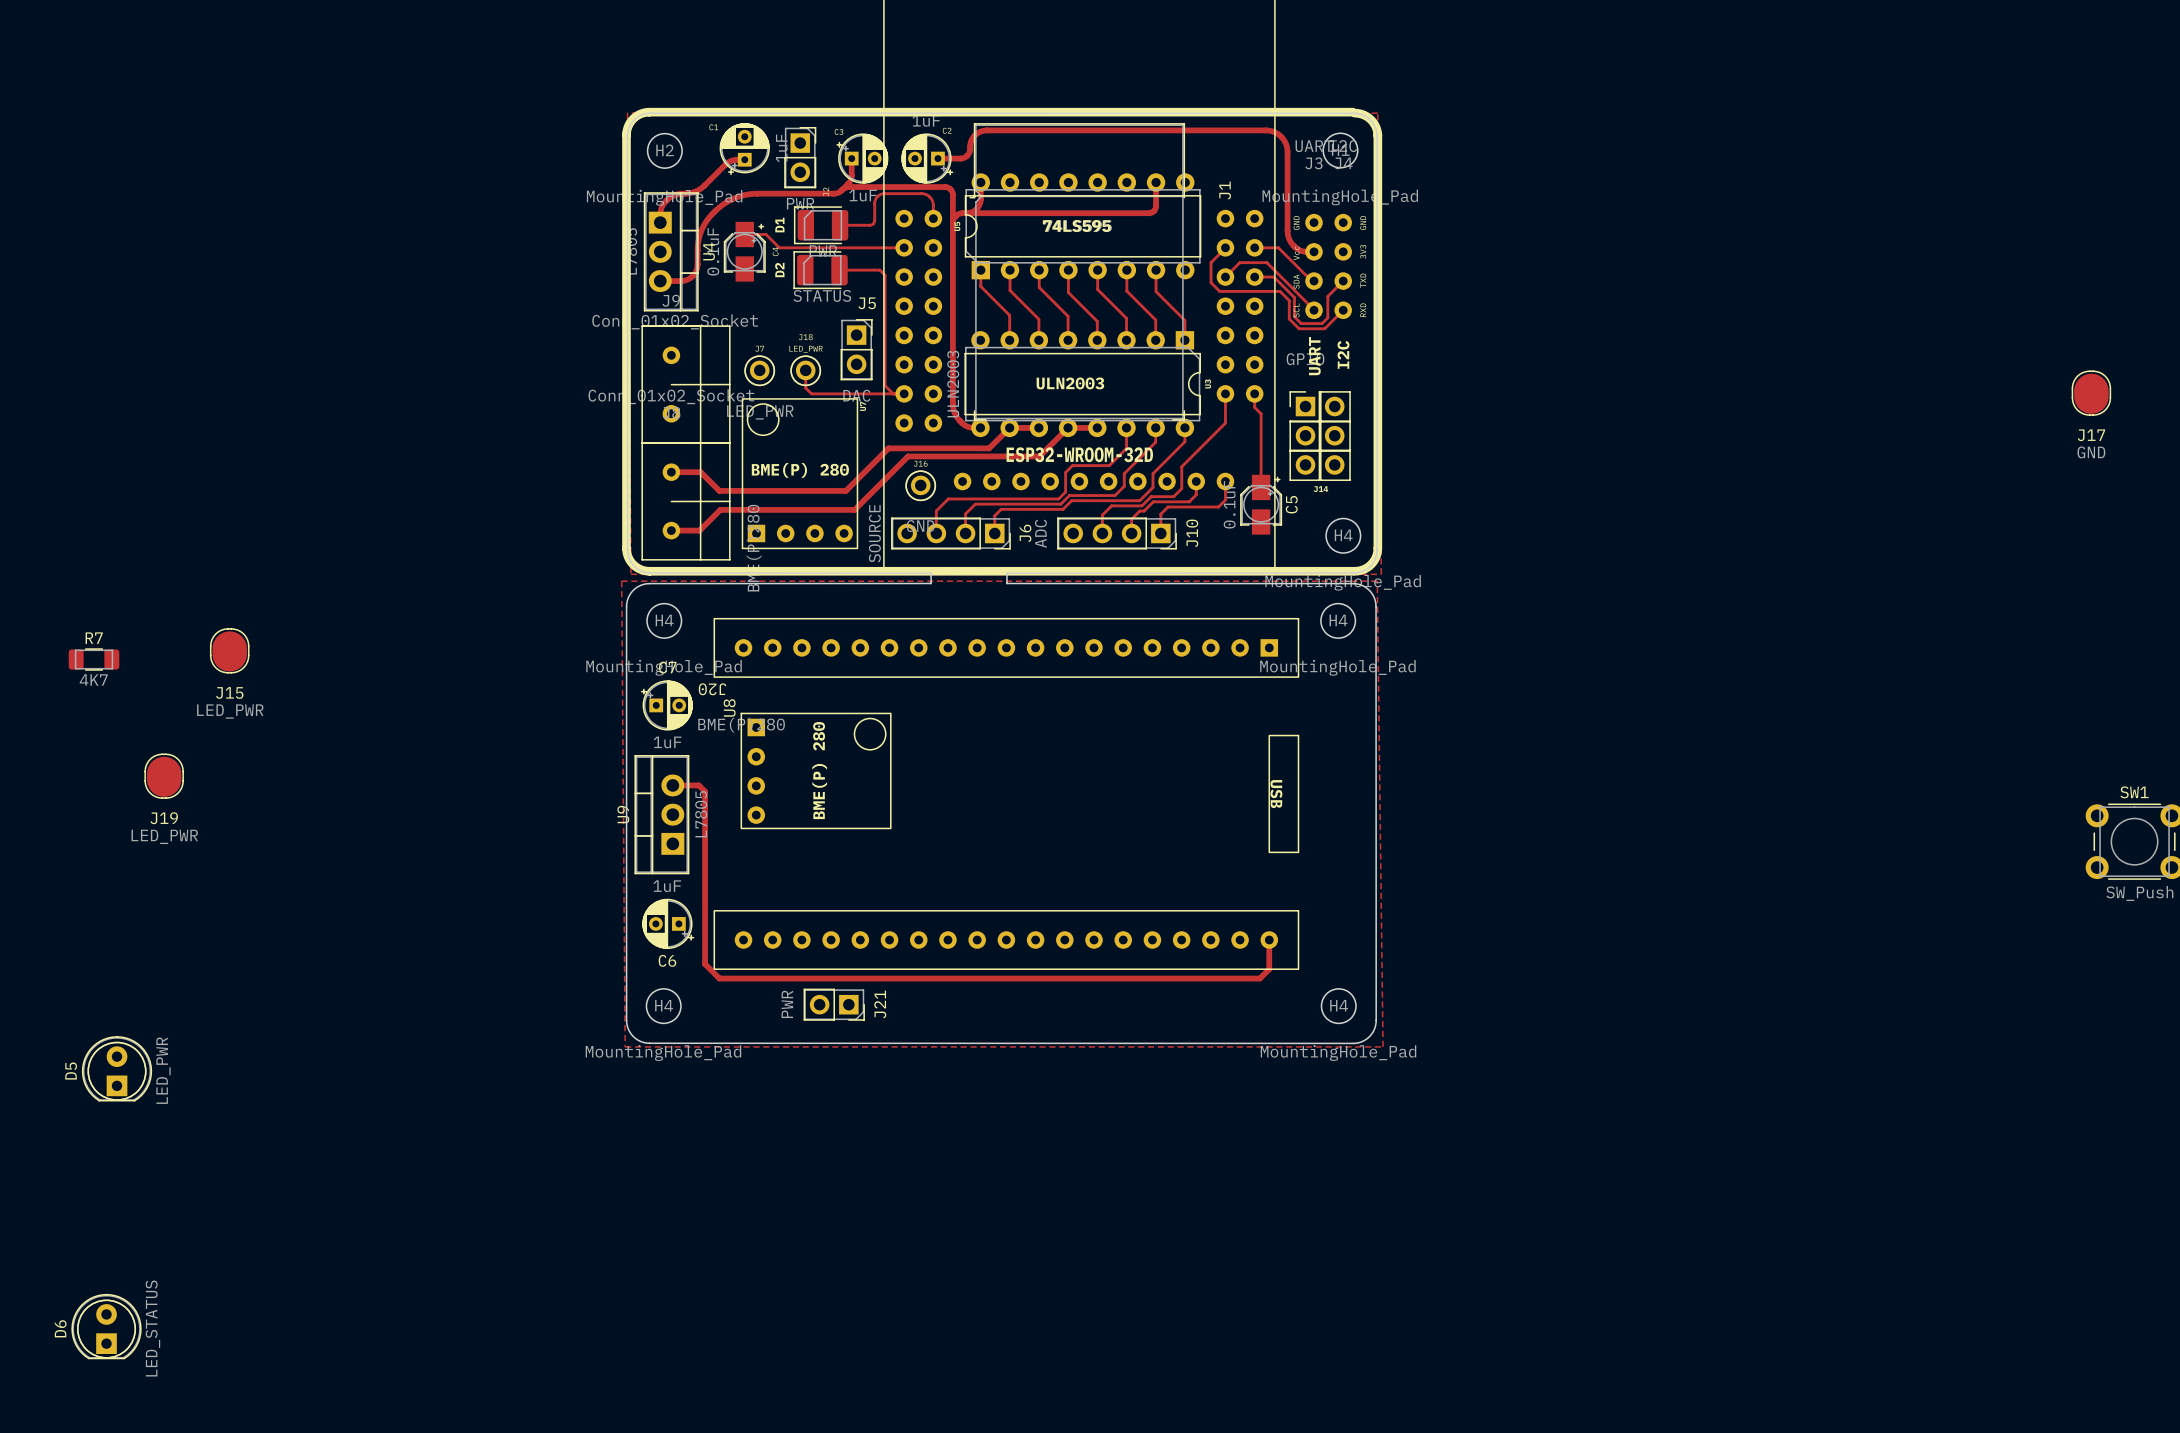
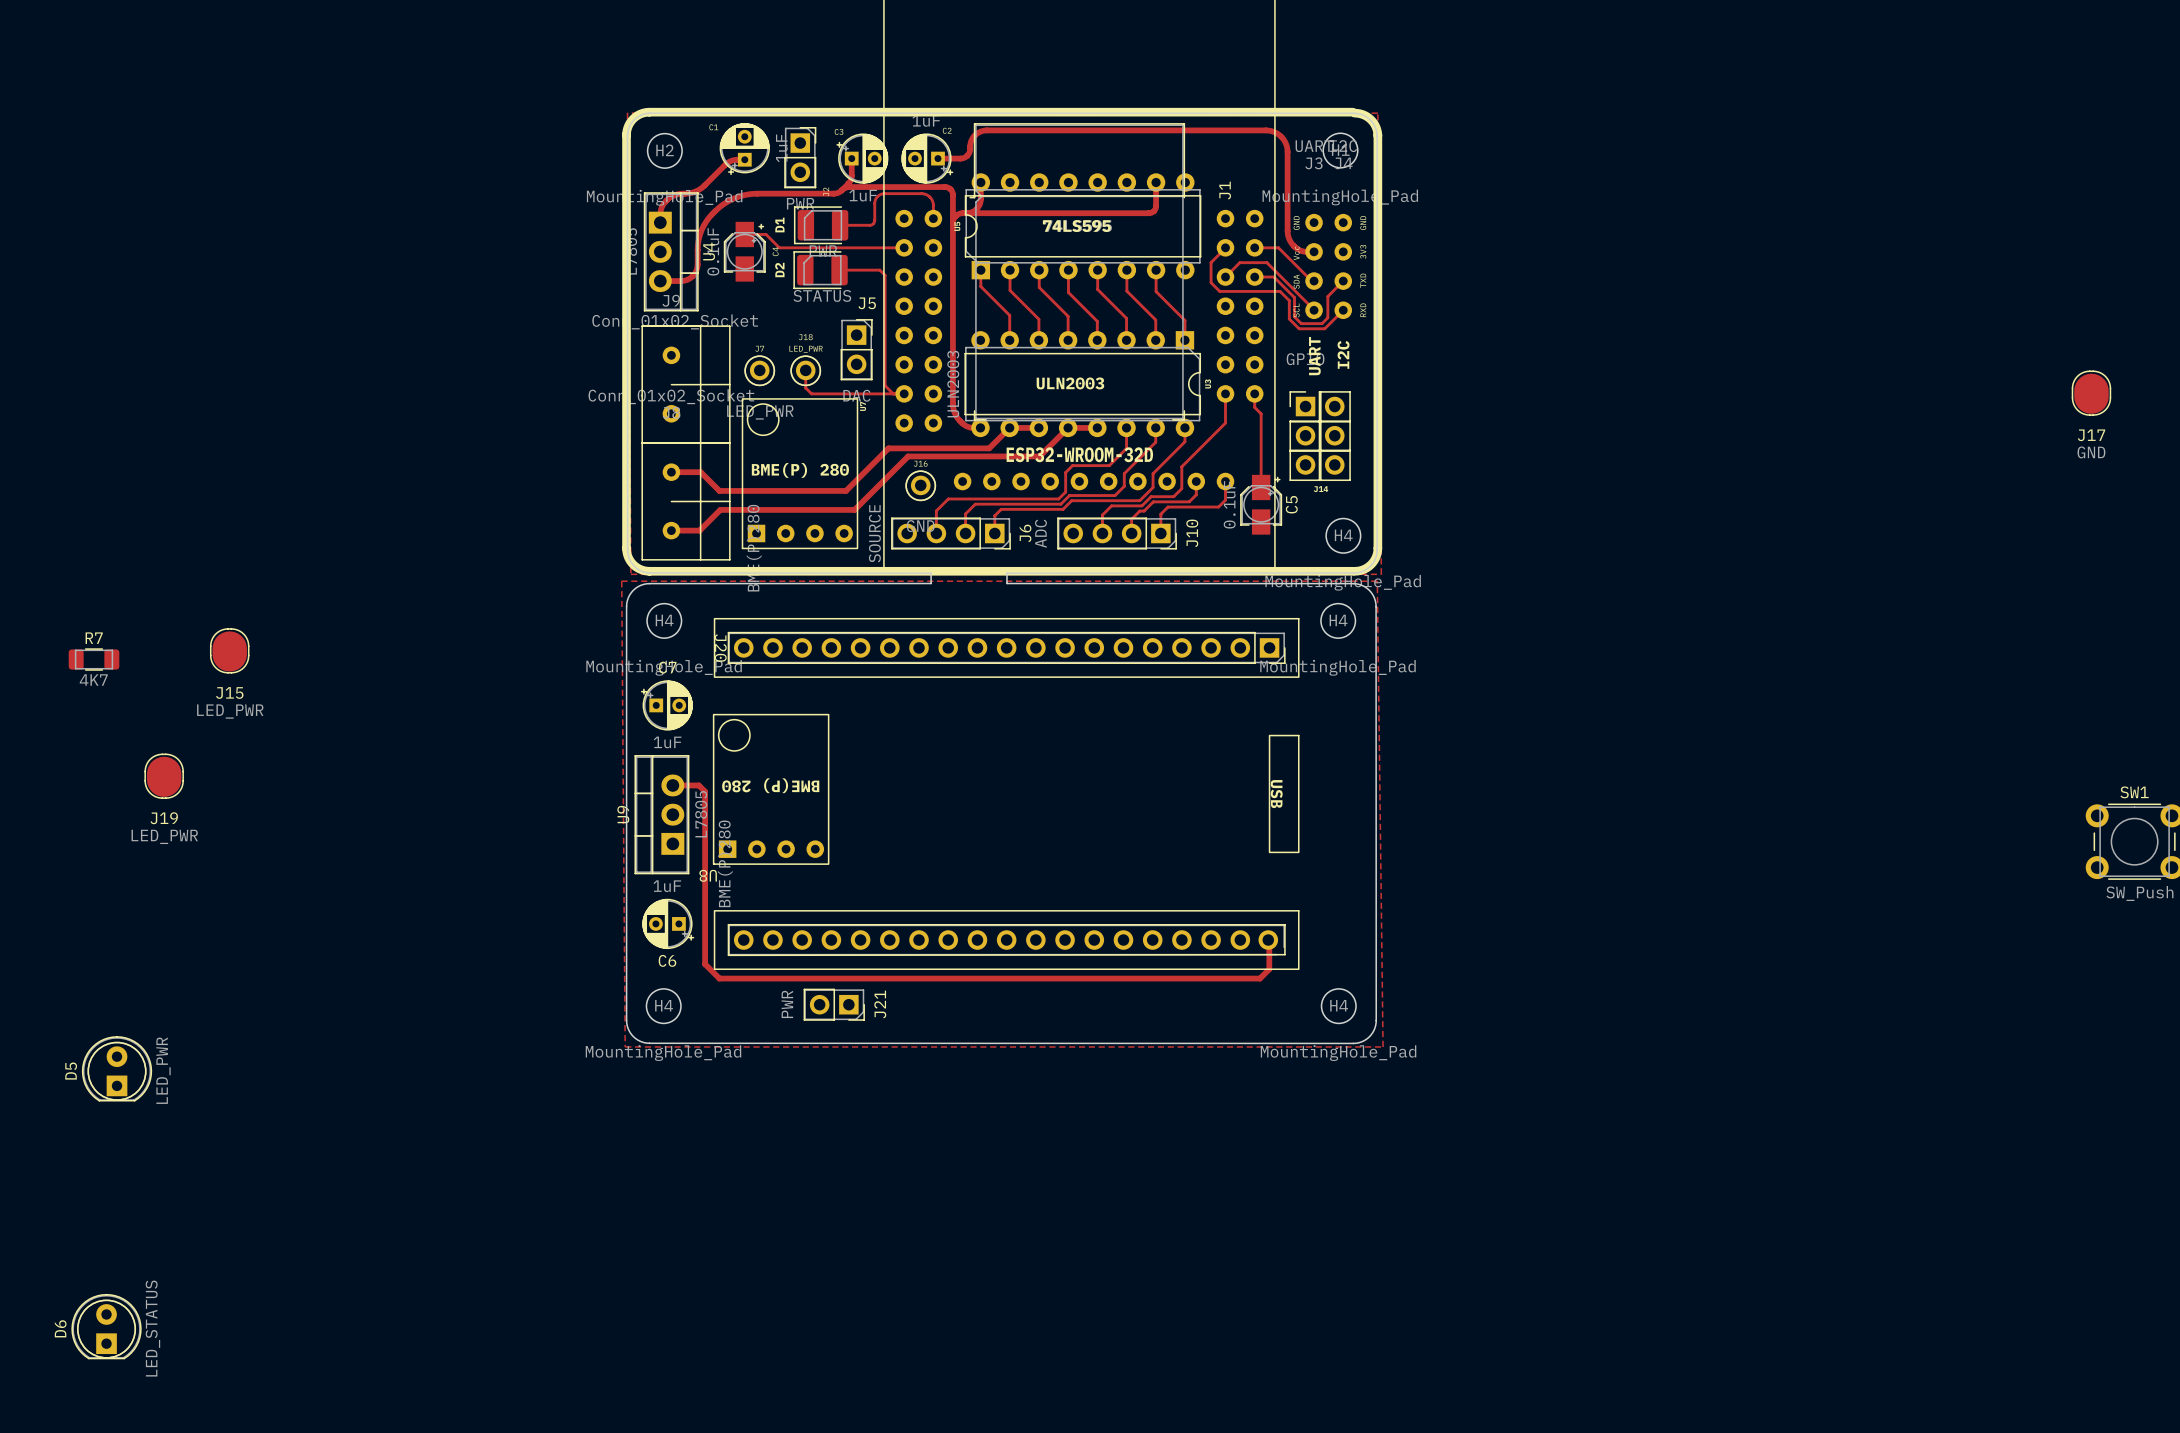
J20 footprint: [713, 618, 1300, 970] -> [713, 618, 1300, 970]
J20 name position: J20 (712, 689) -> J20 (720, 648)
U8 rotation: 0° (816, 770) -> 90° counterclockwise (771, 789)

